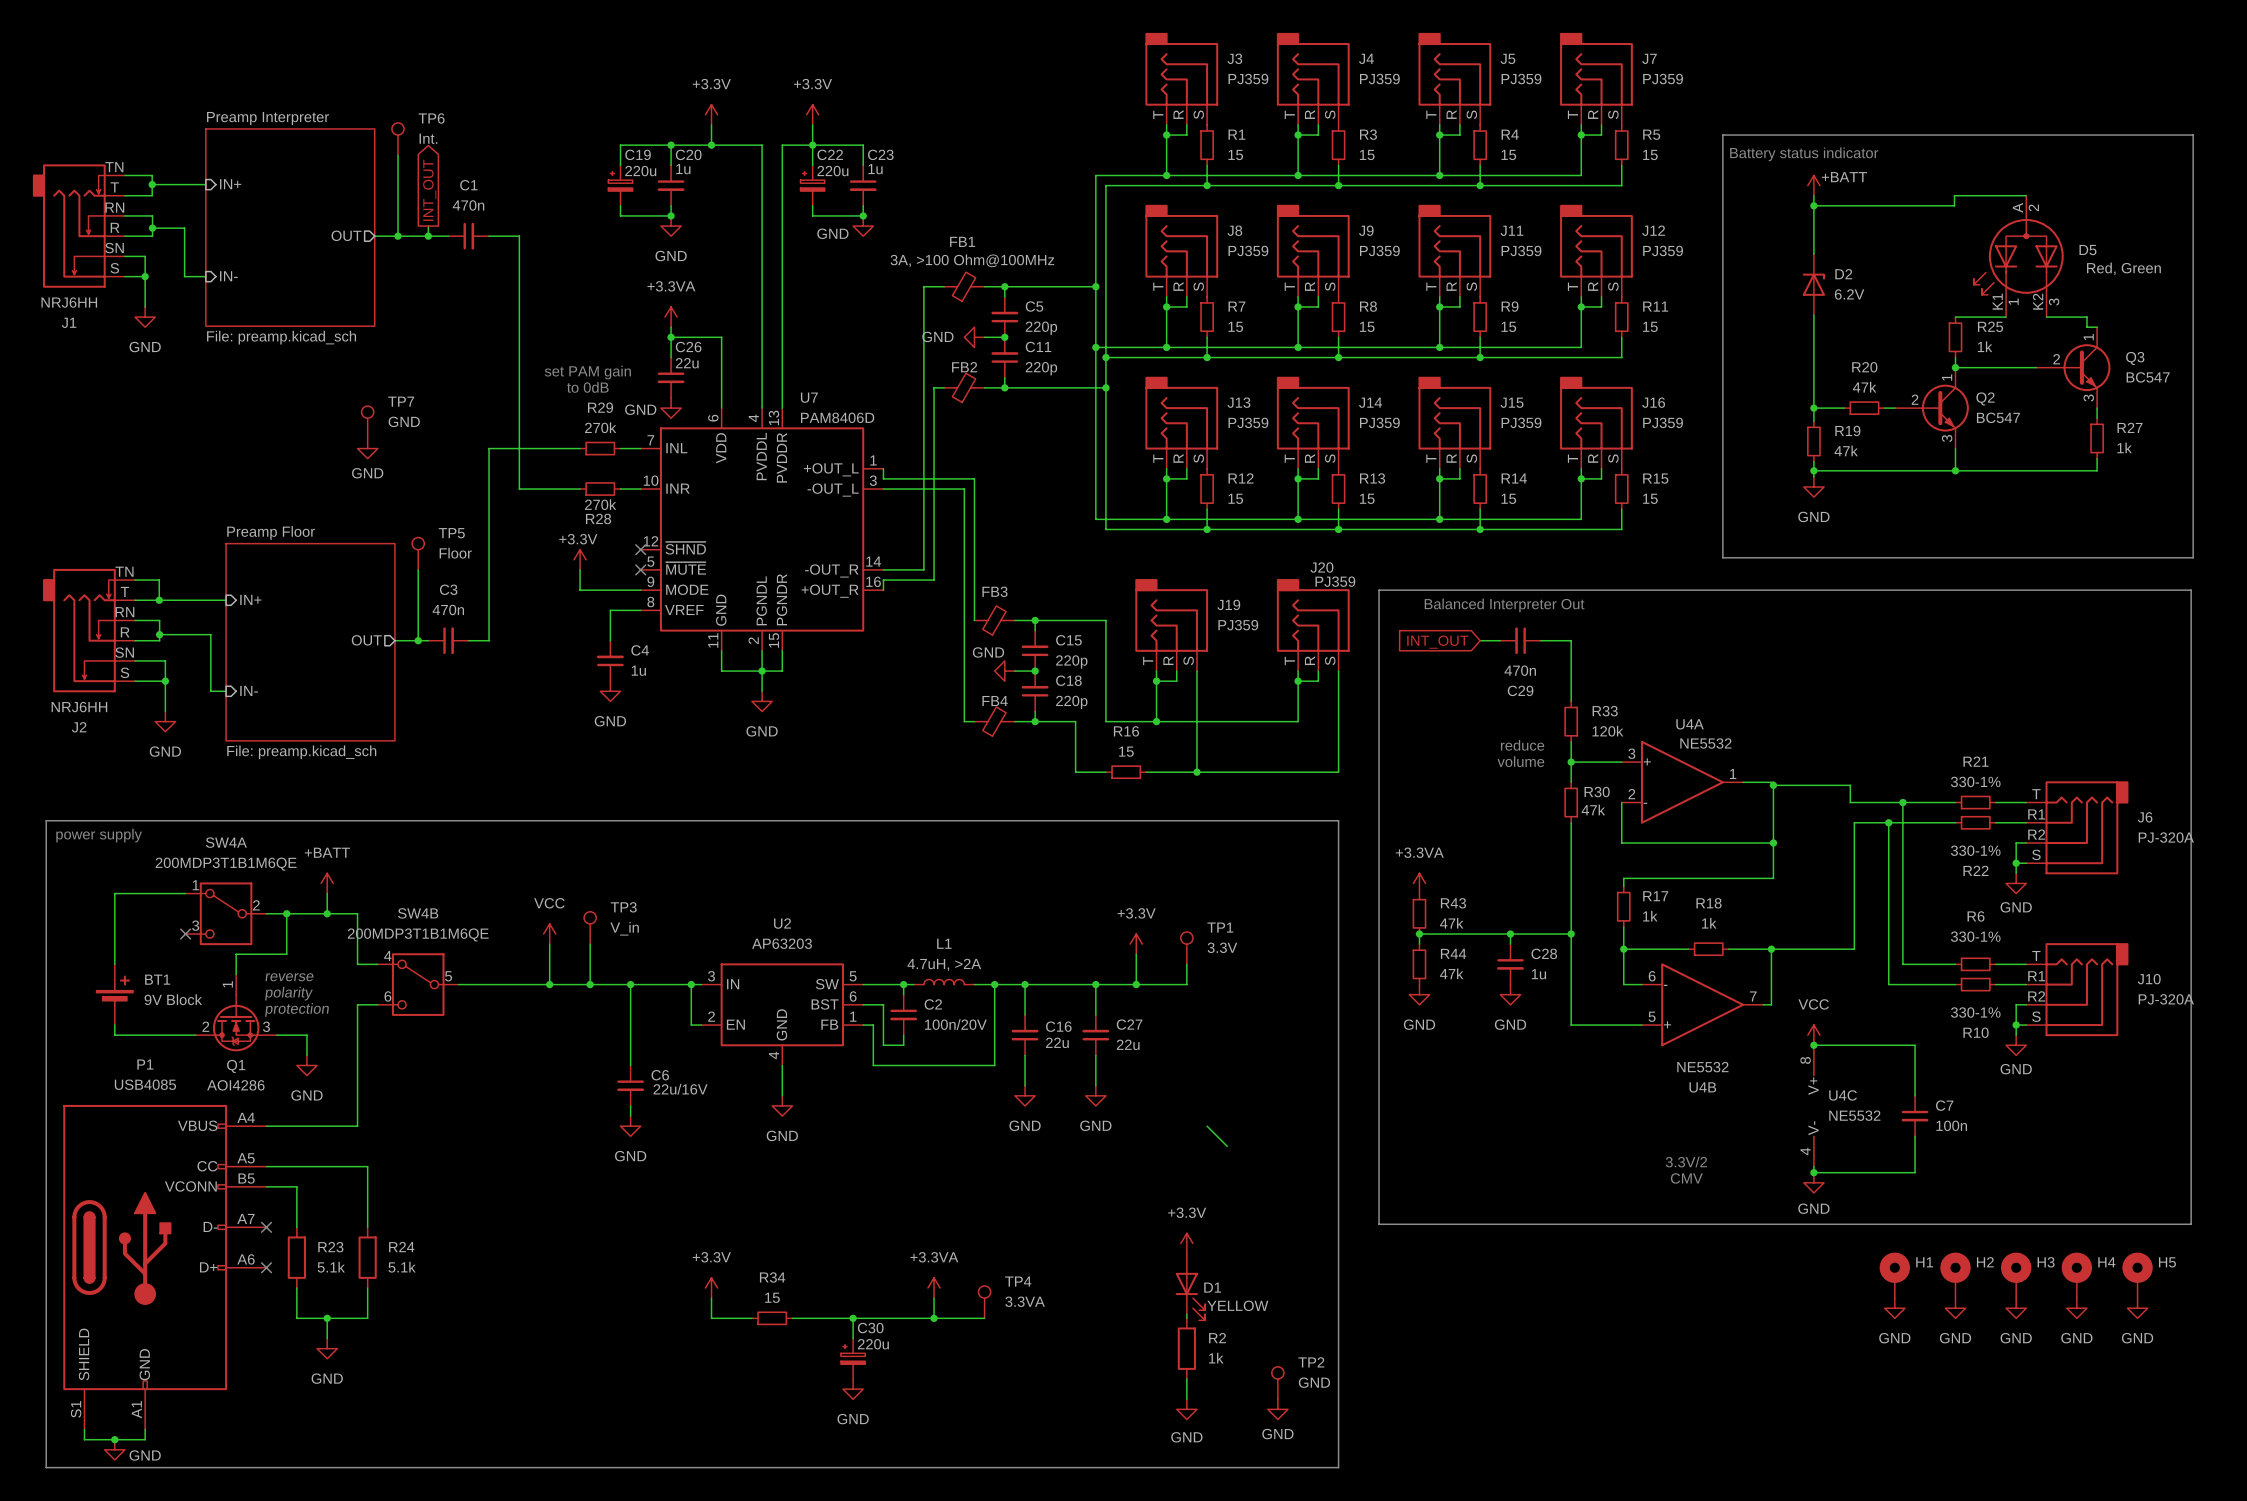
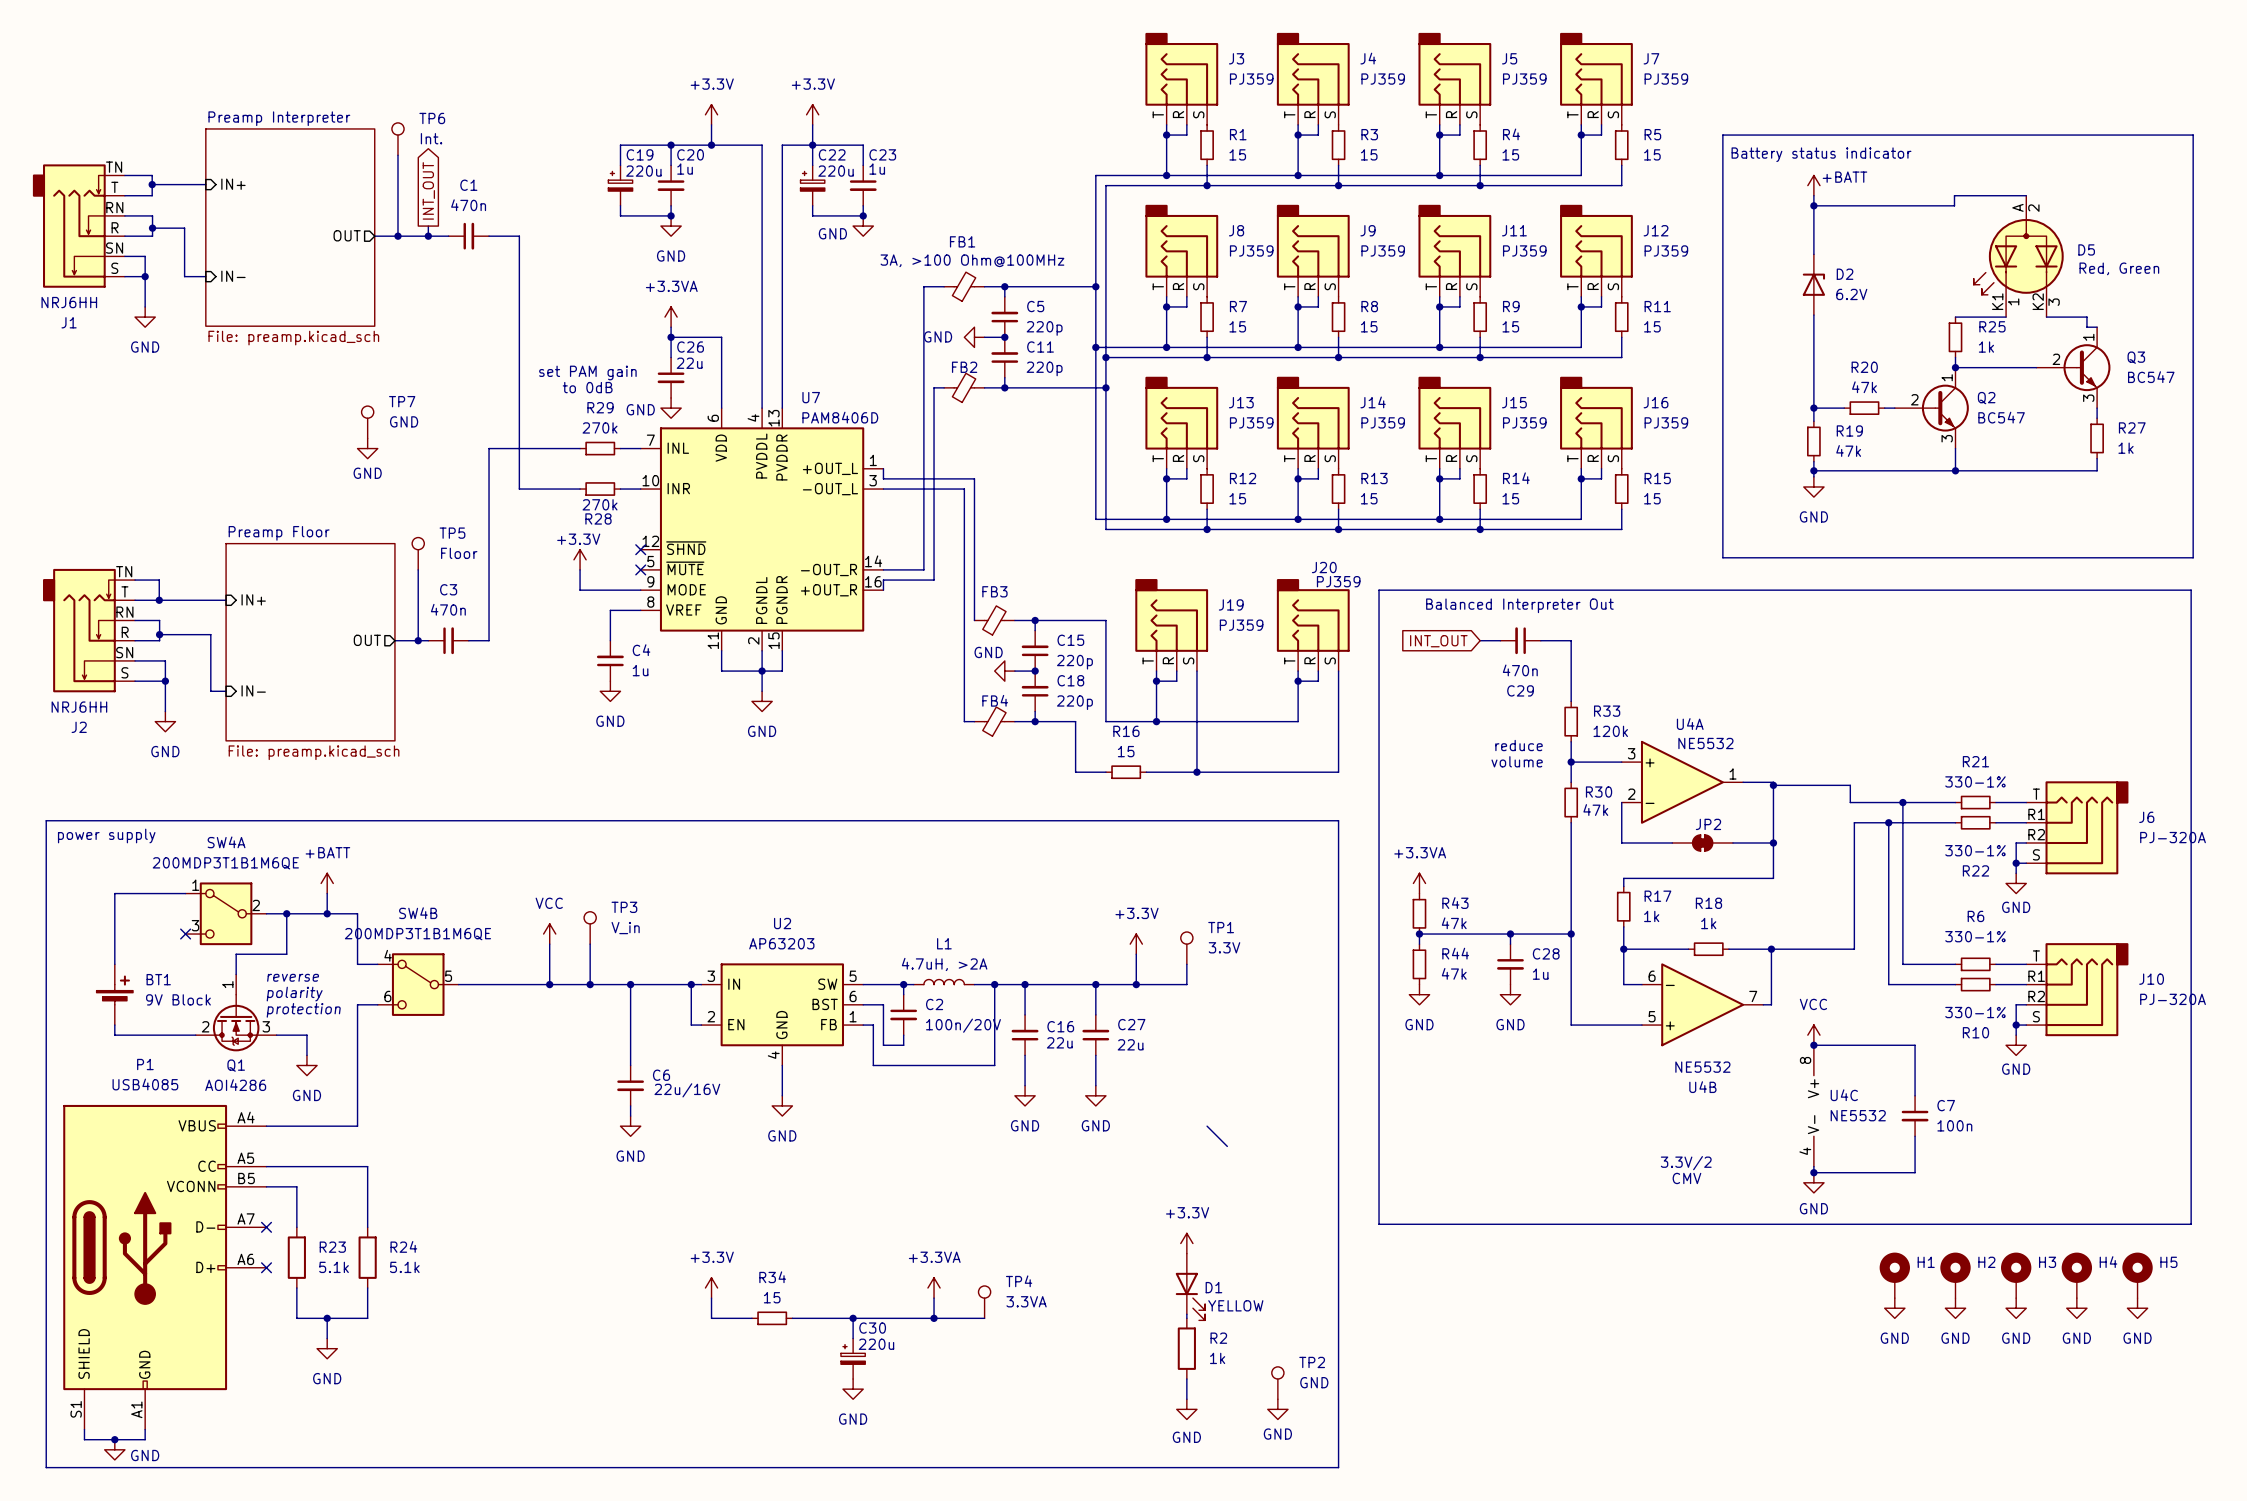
JP2: none -> (1702, 842)

